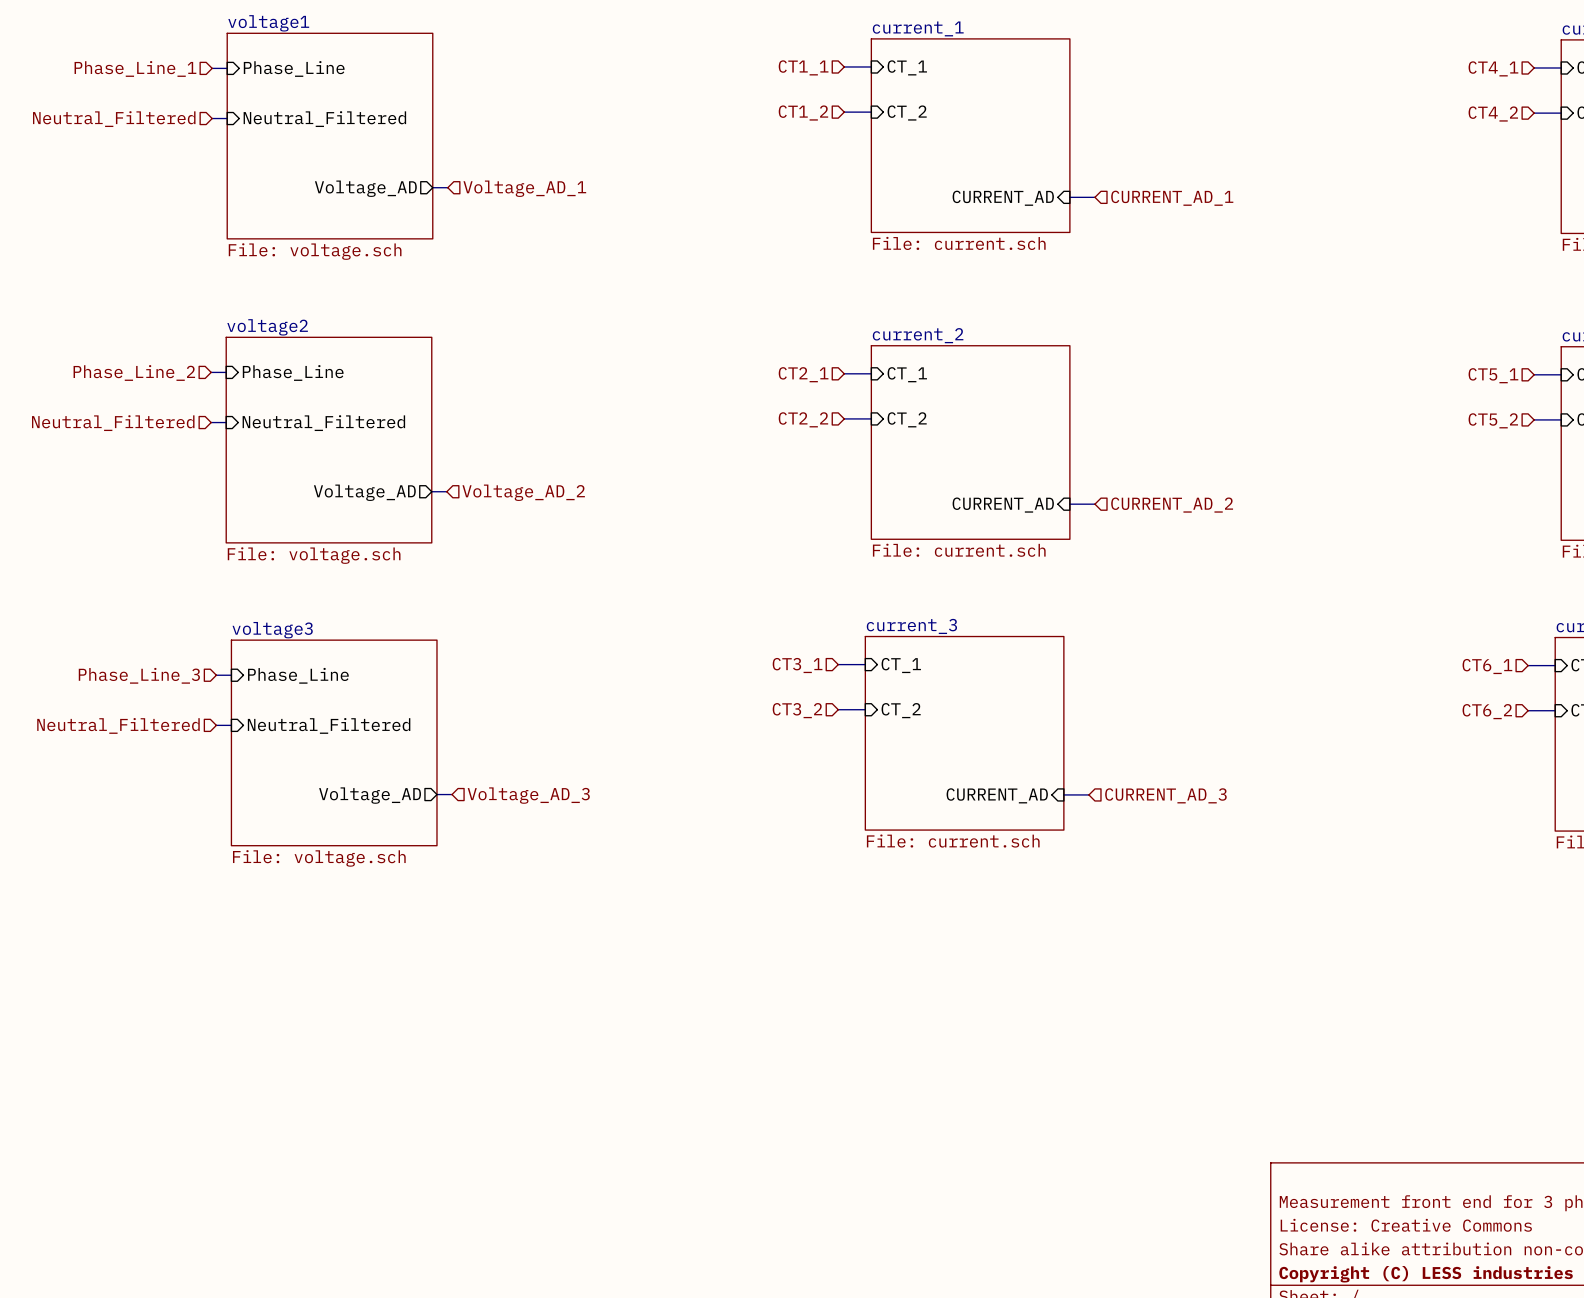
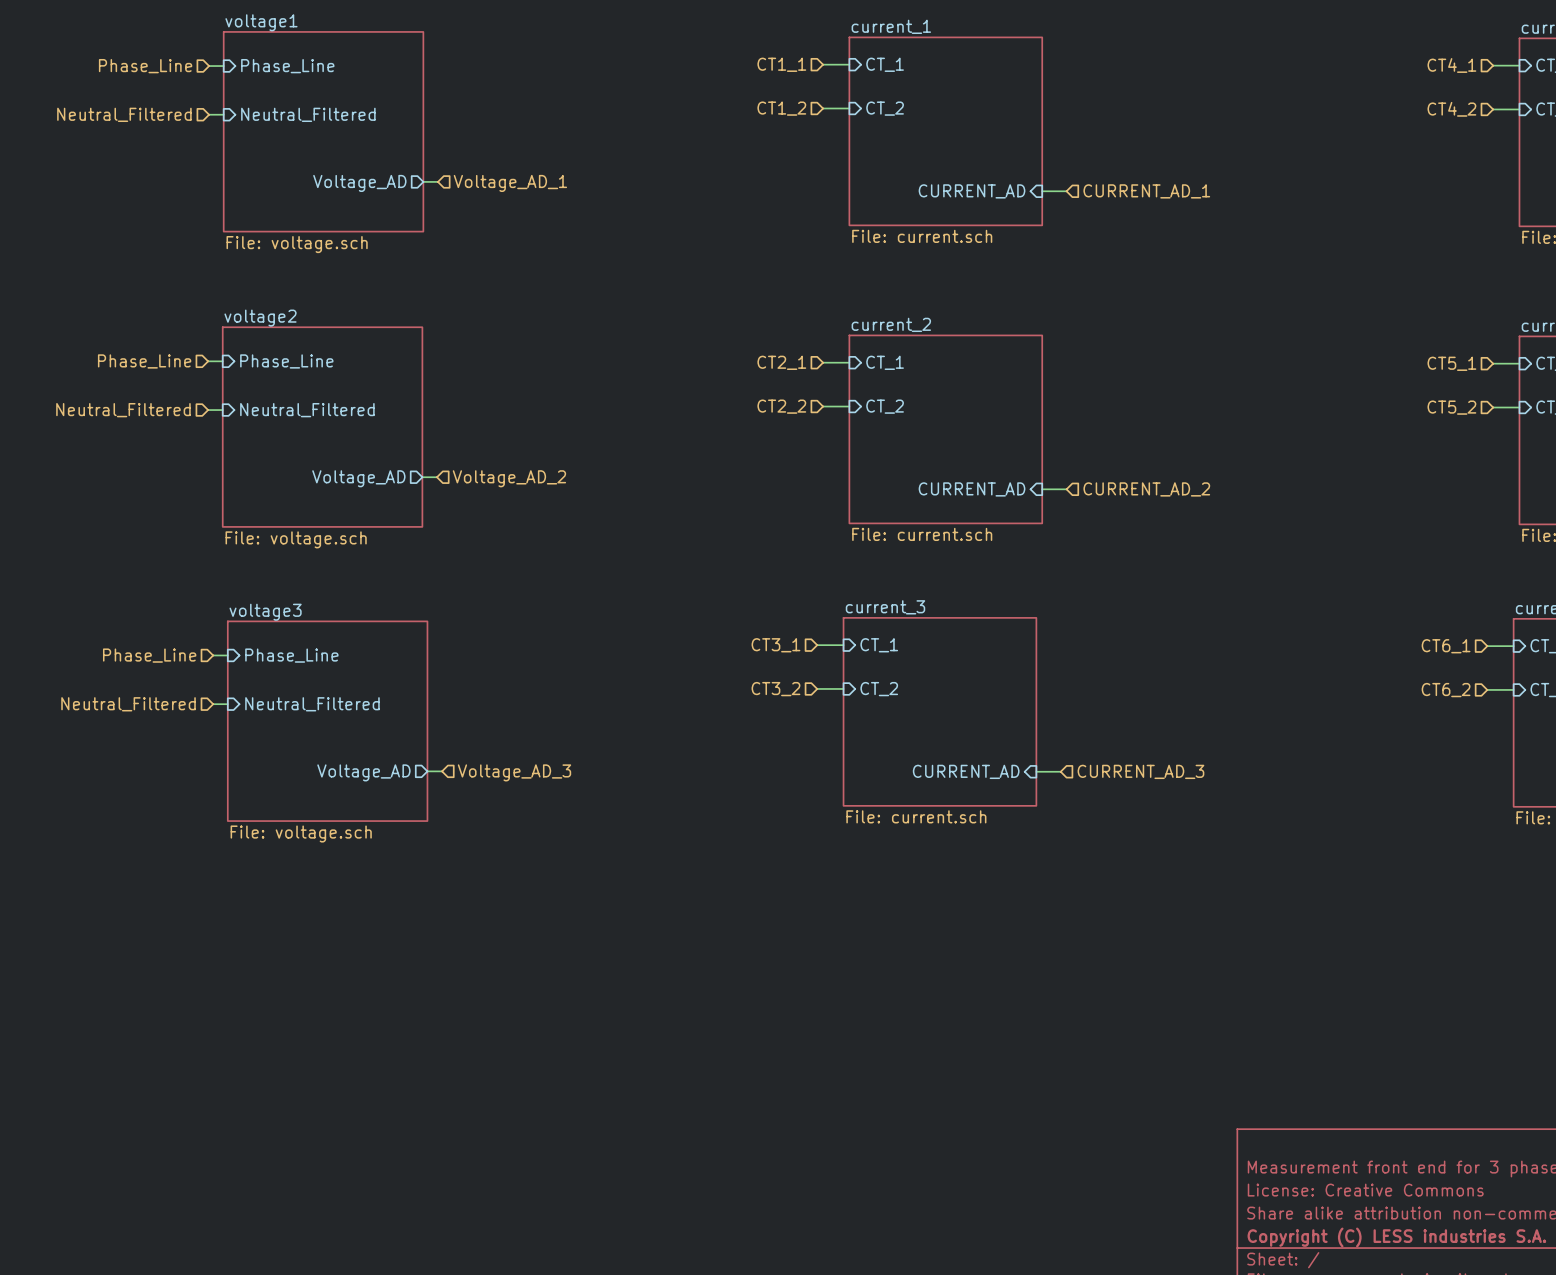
hierarchical label: Phase_Line_1 (135, 68) -> Phase_Line (145, 66)
hierarchical label: Phase_Line_2 (134, 372) -> Phase_Line (144, 361)
hierarchical label: Phase_Line_3 (139, 675) -> Phase_Line (149, 655)

